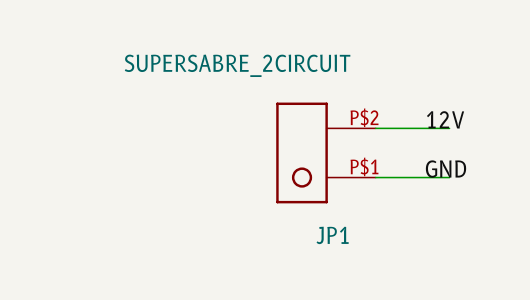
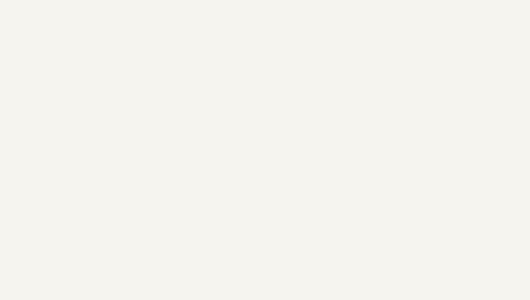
label: 12V (445, 119) -> none
wire: (375, 128) (449, 128) -> none
JP1: SUPERSABRE_2CIRCUIT (326, 152) -> none
label: GND (446, 169) -> none
wire: (375, 177) (449, 177) -> none

